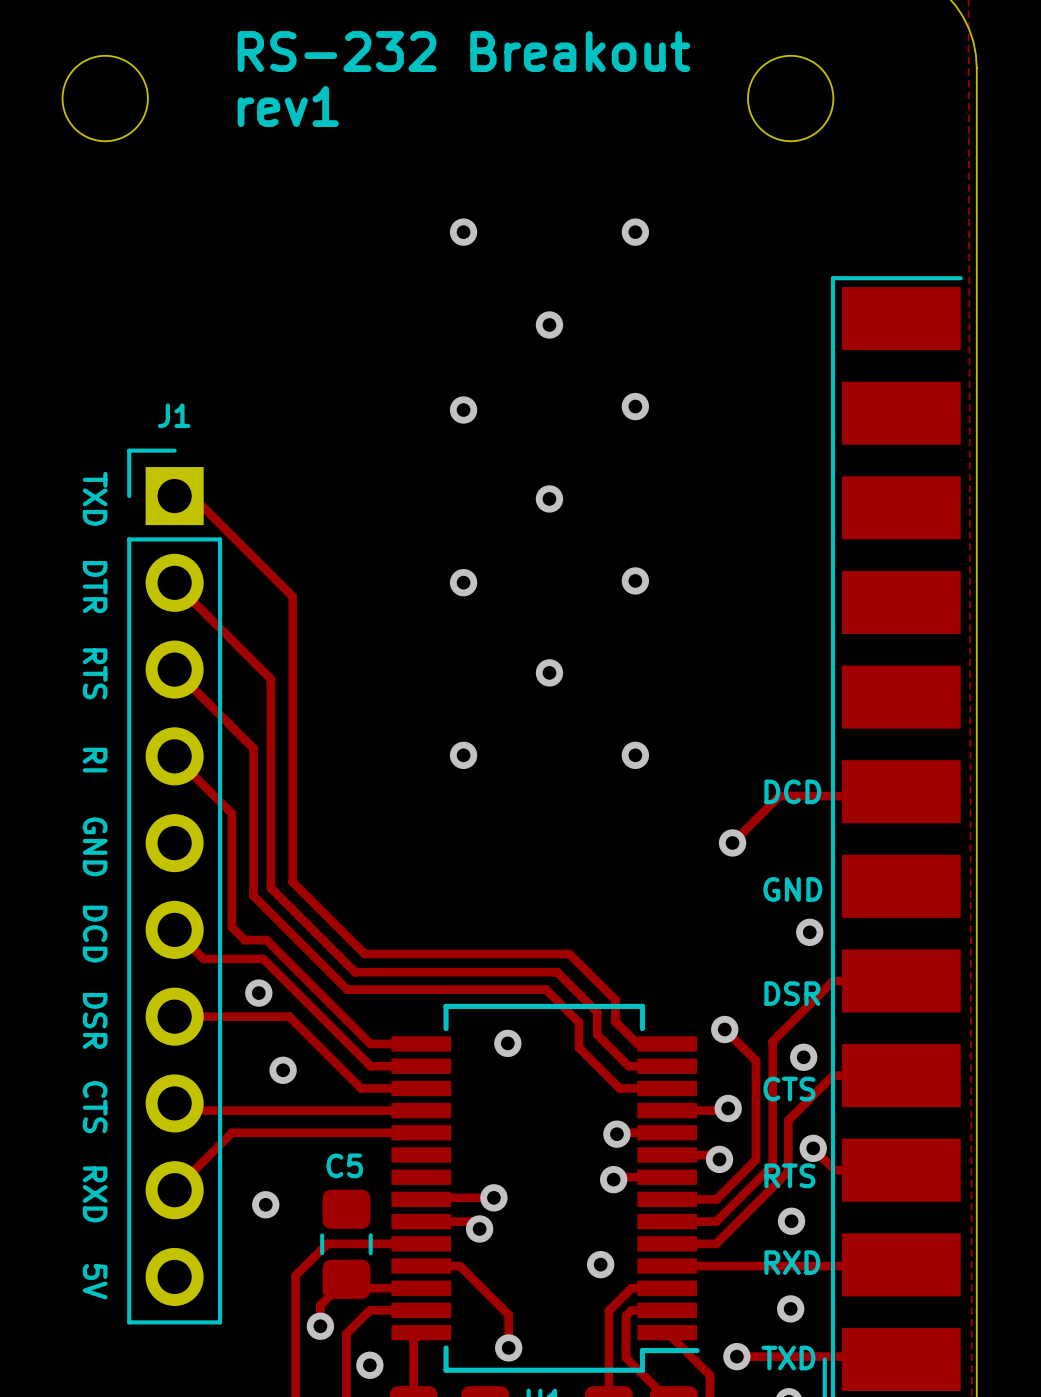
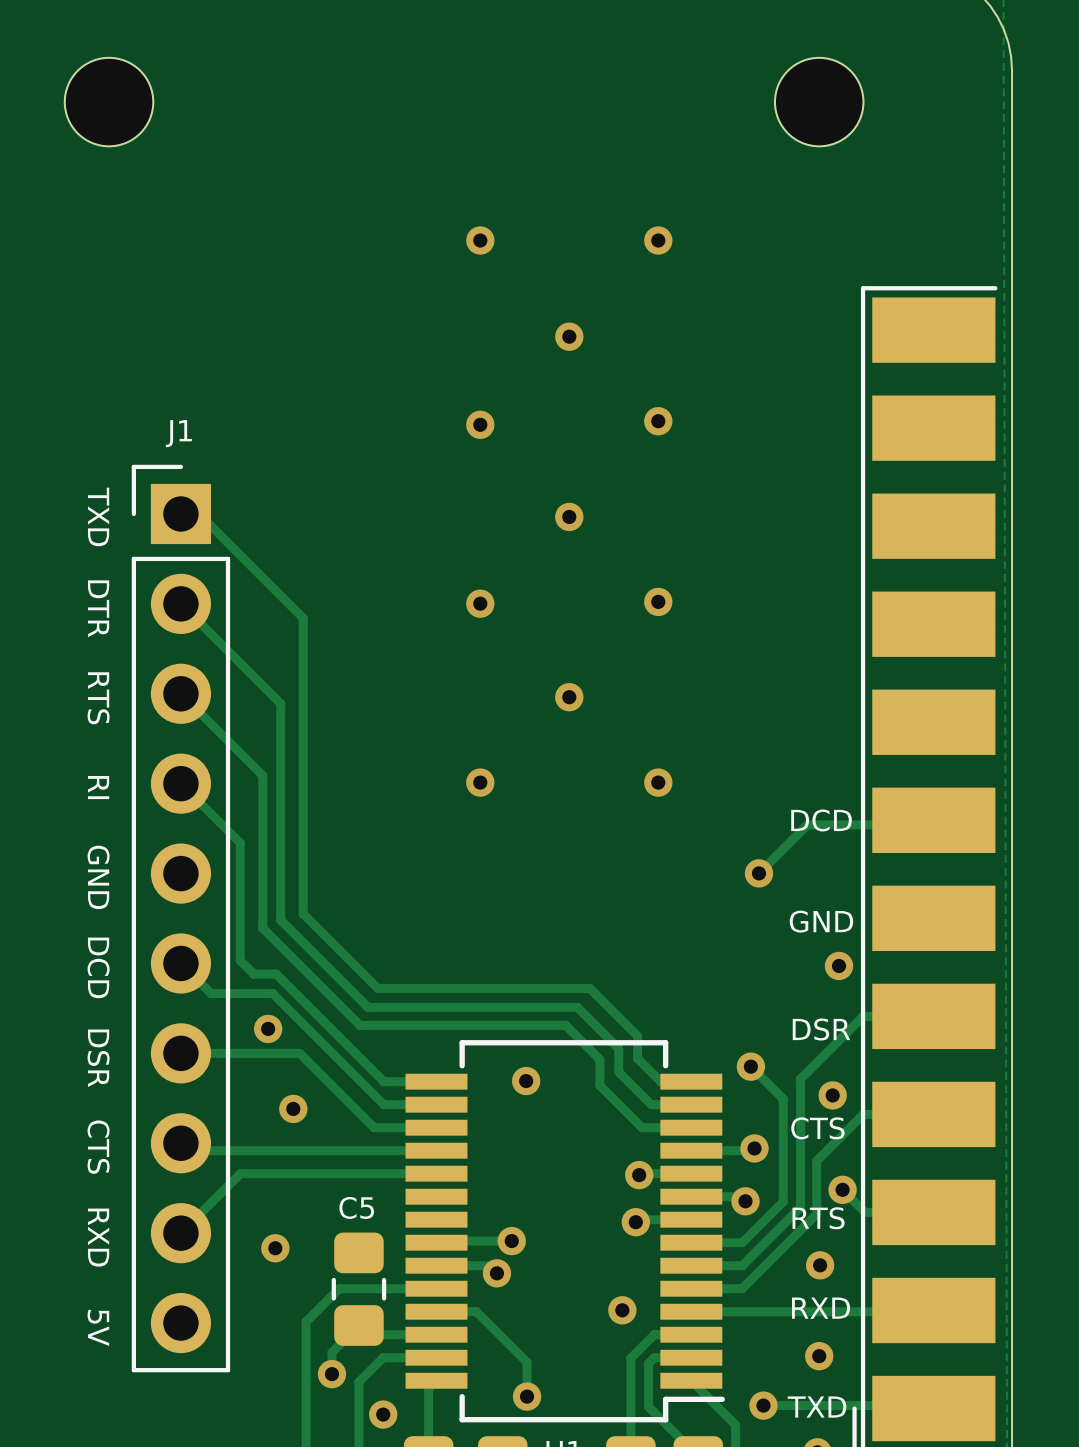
text: RS-232 Breakout (463, 51) -> none
text: rev1 (288, 106) -> none

